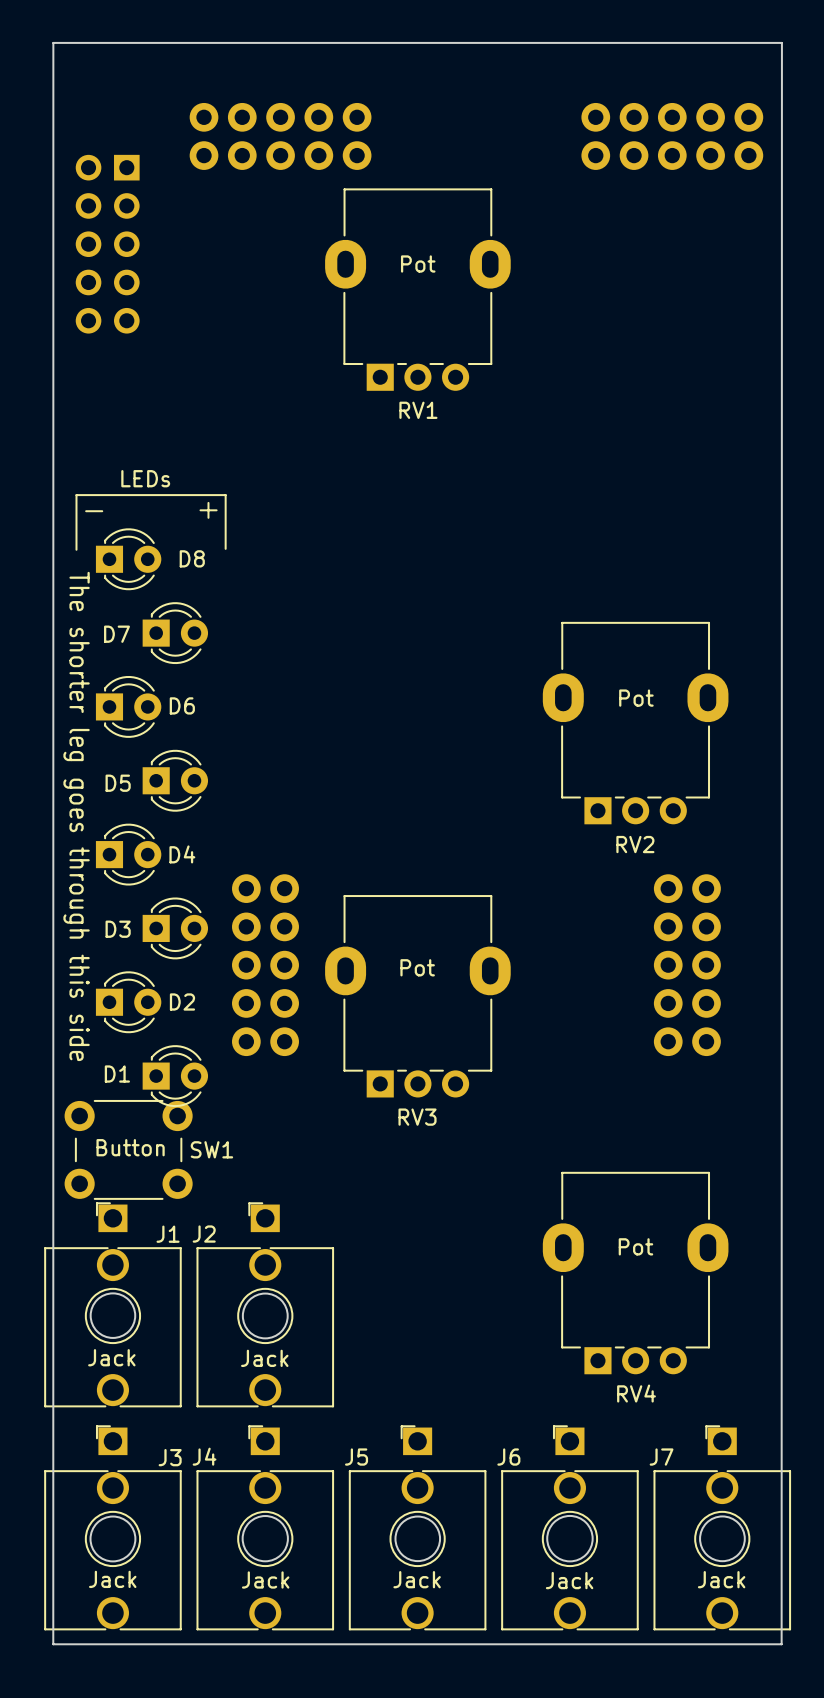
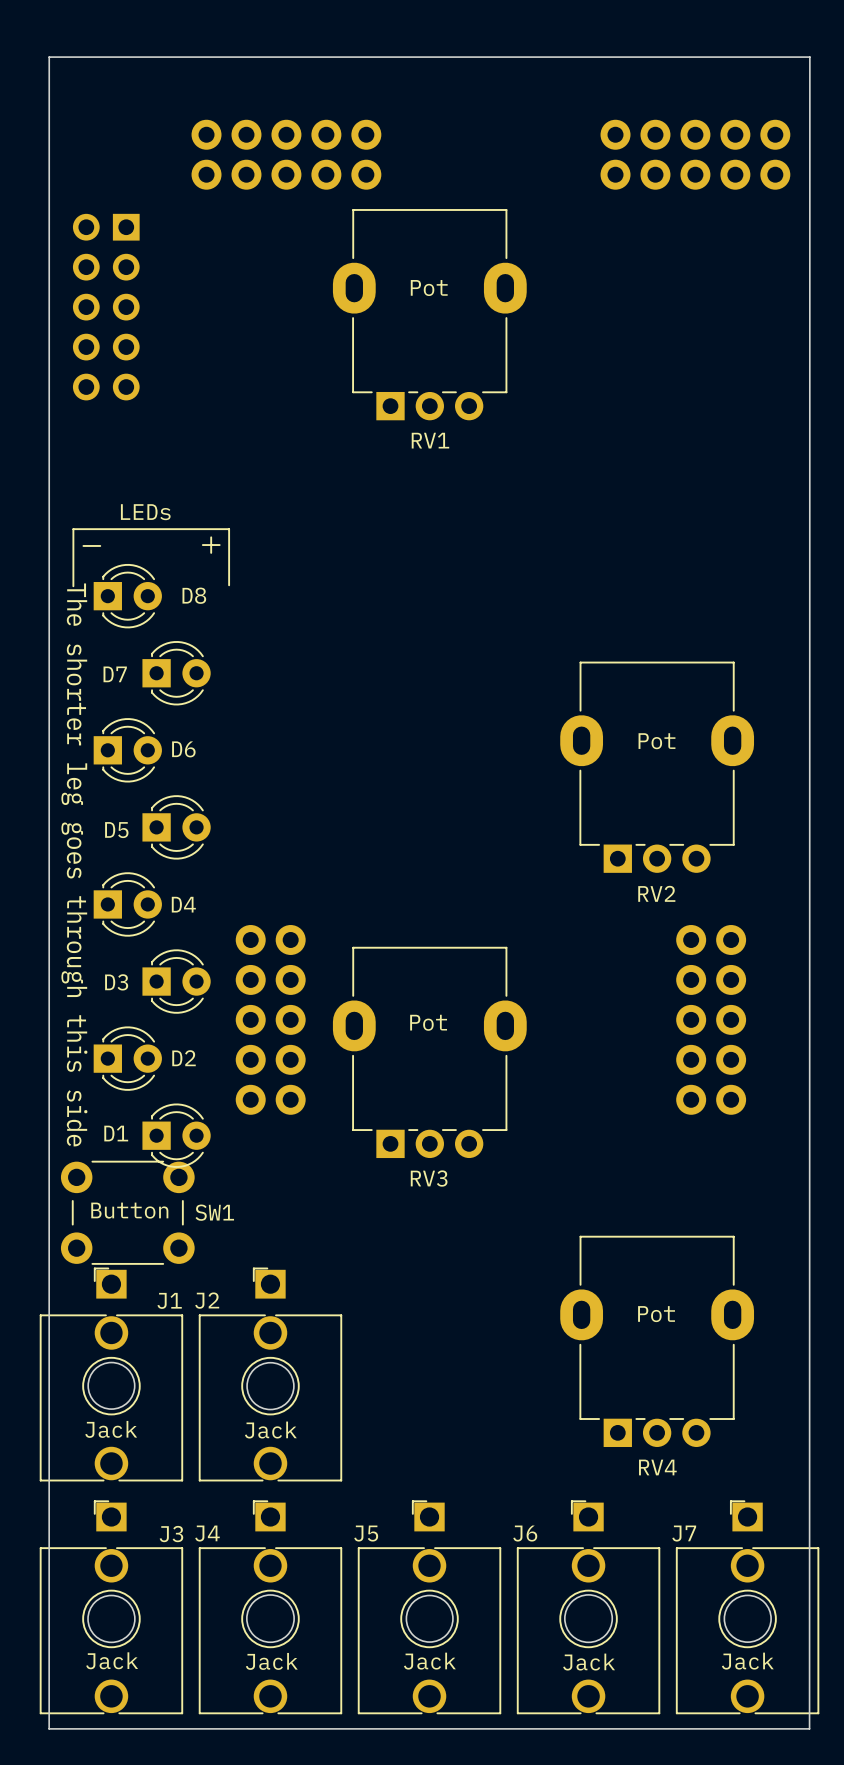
part position: (107, 244) -> (106, 307)

